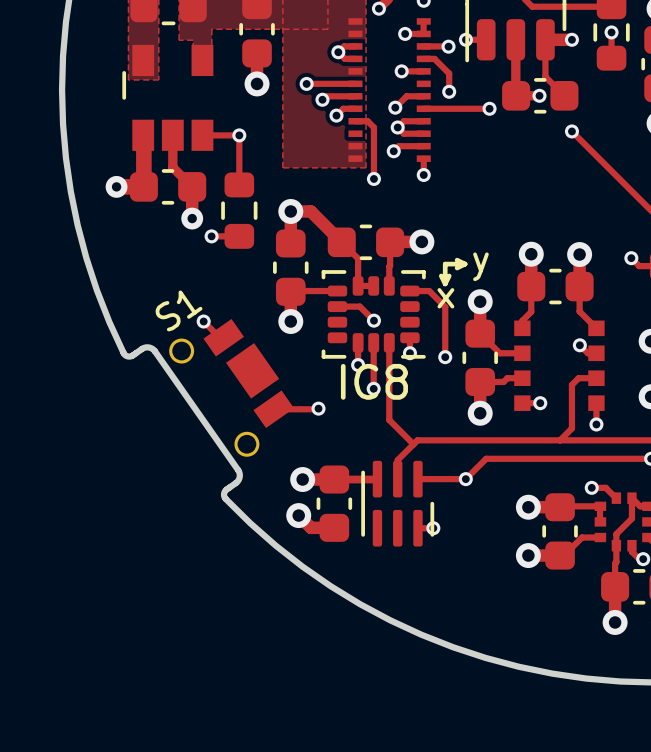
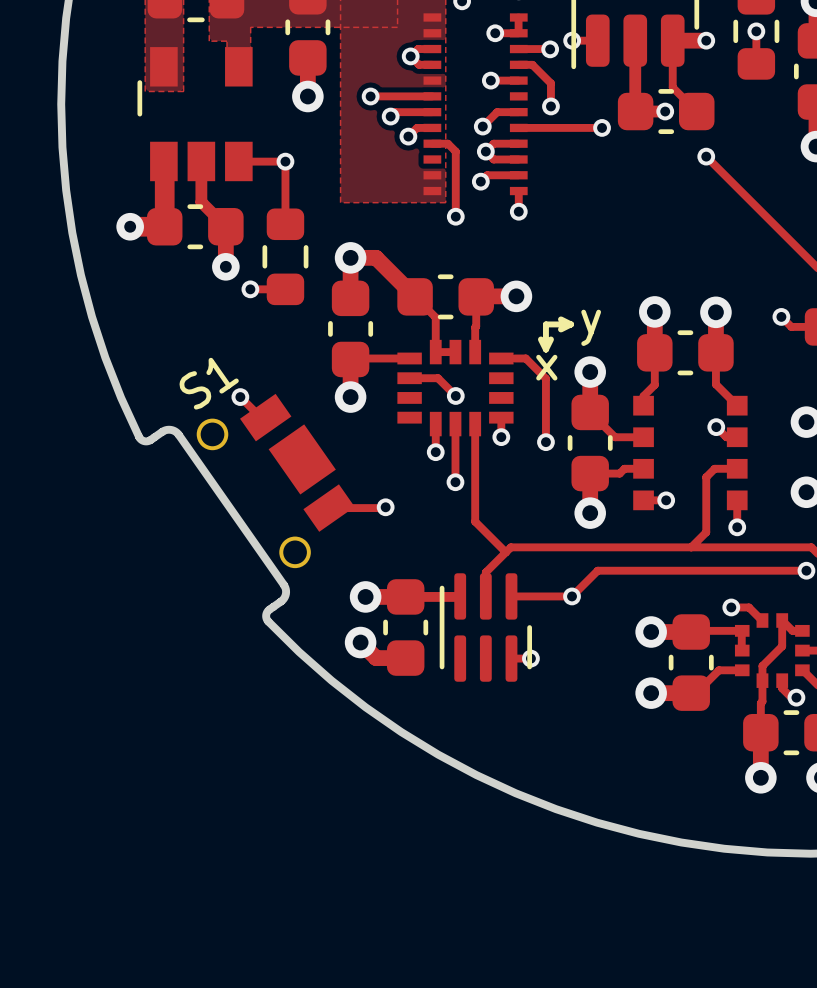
IC8: (373, 314) -> none
part: none -> (455, 388)

